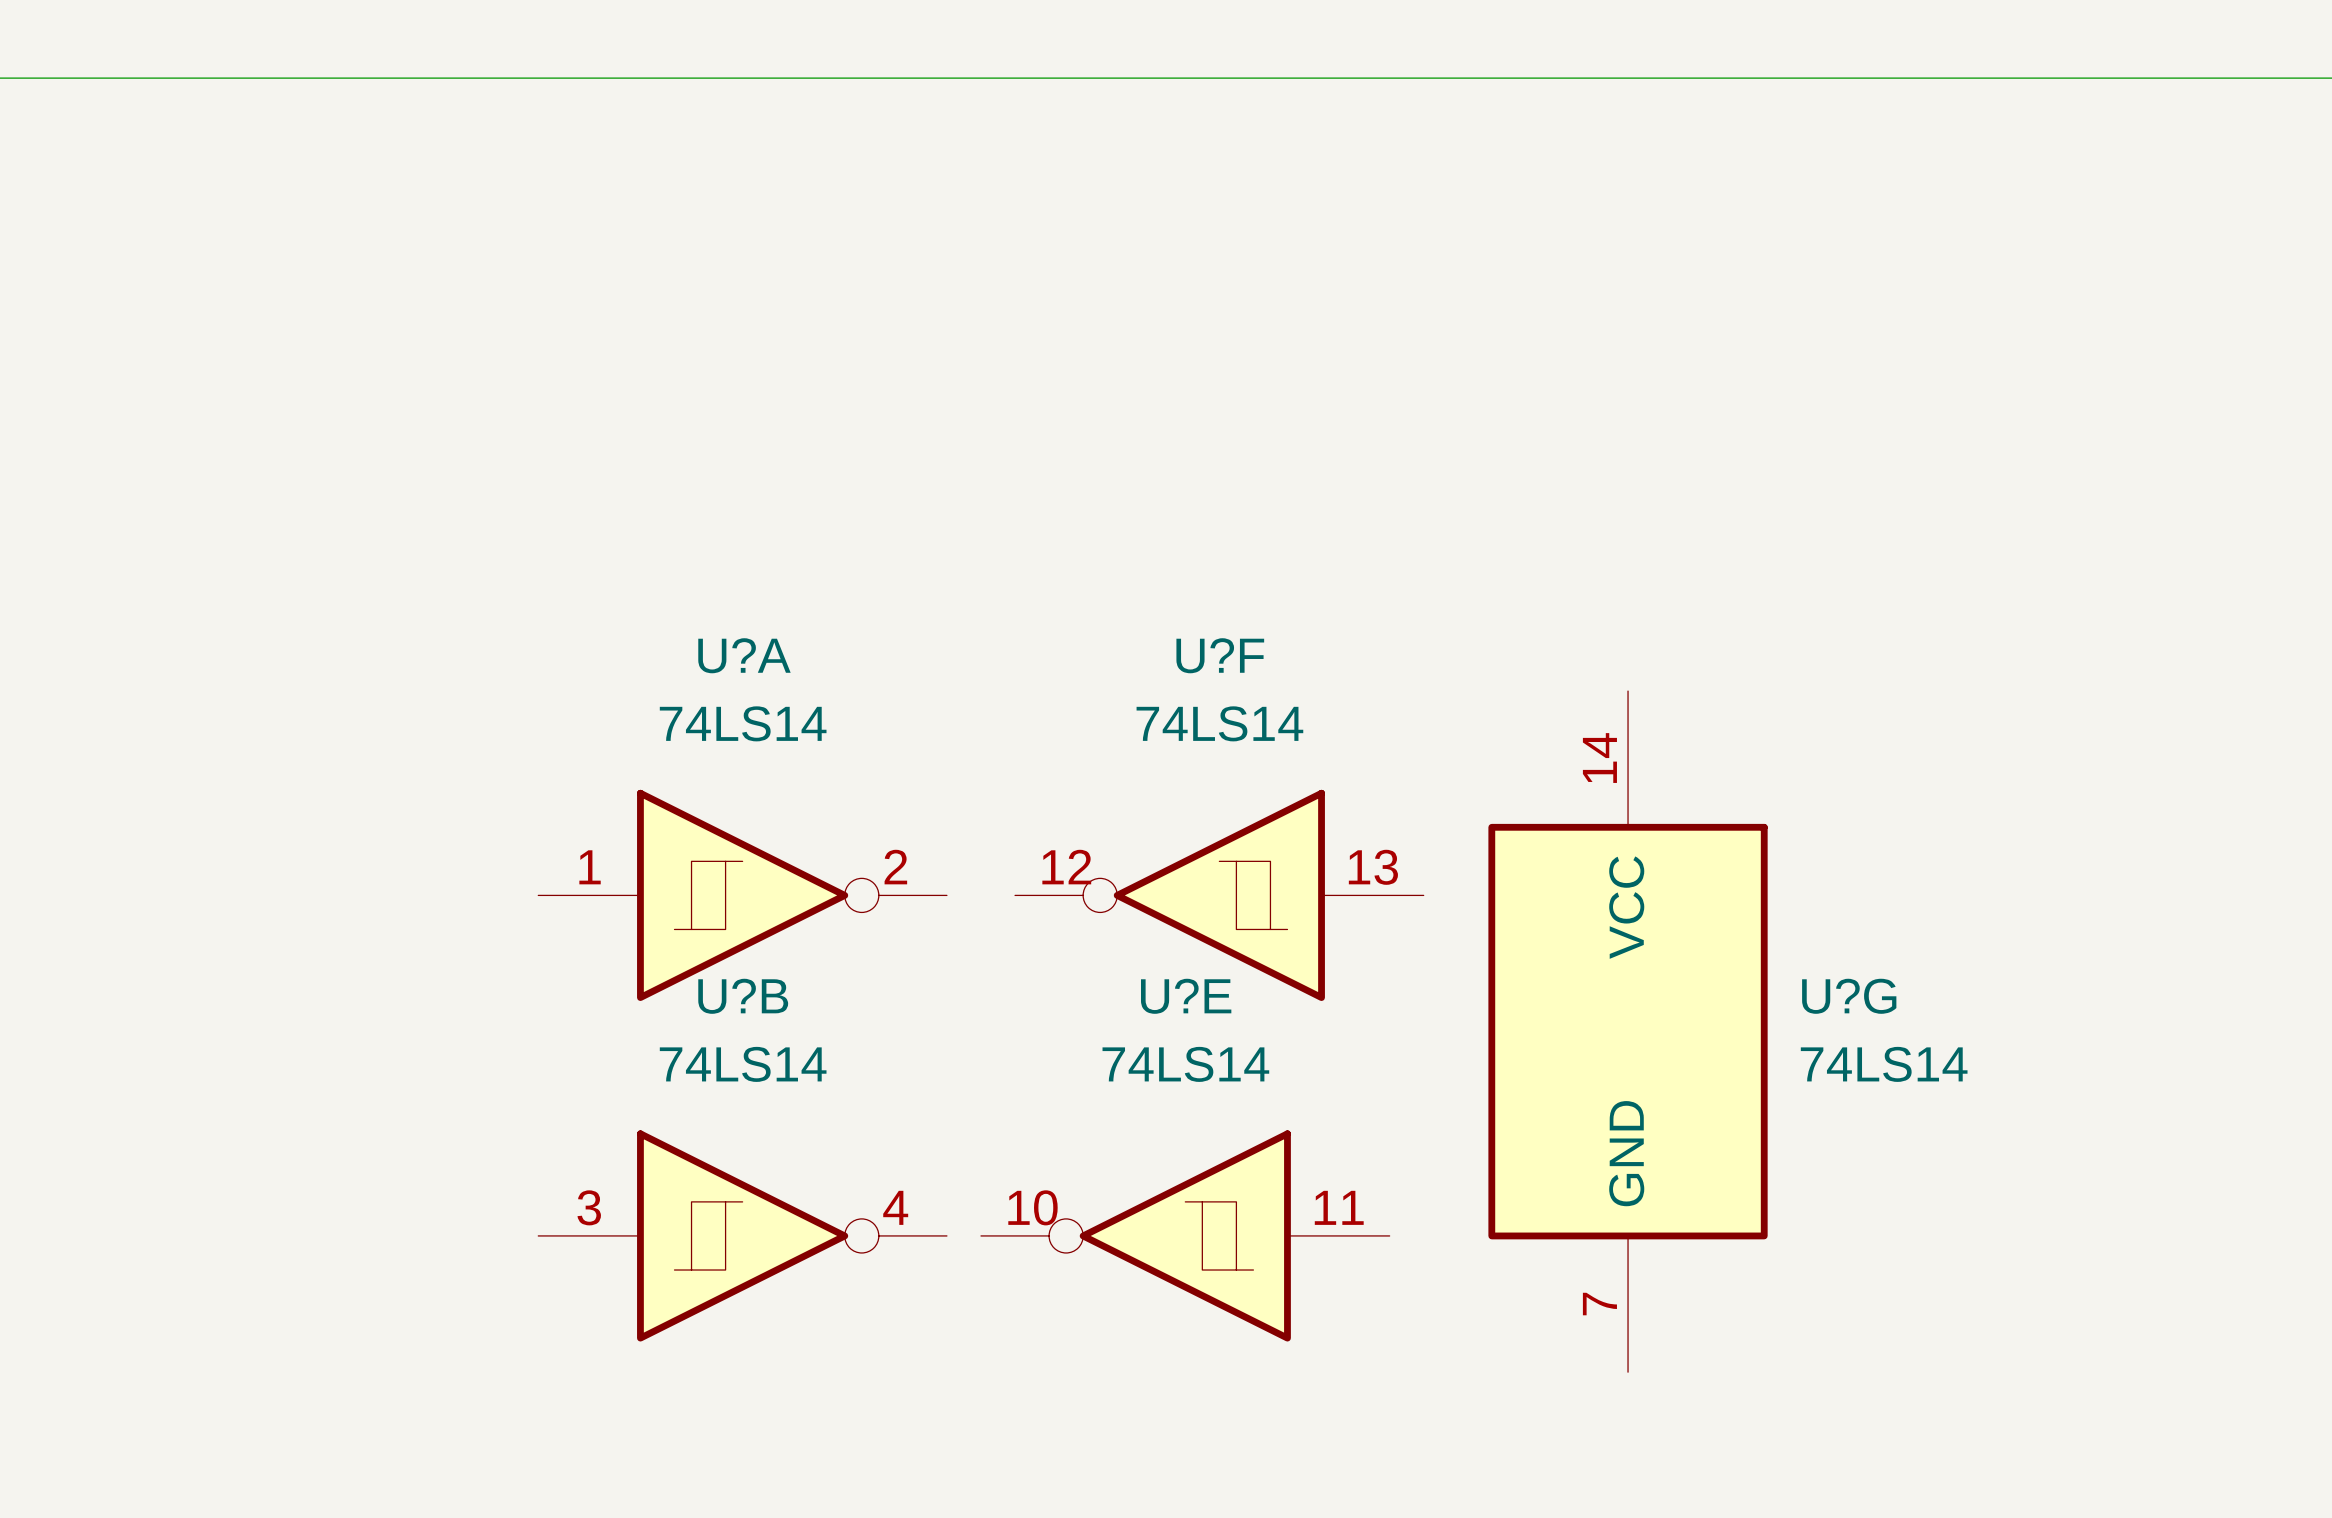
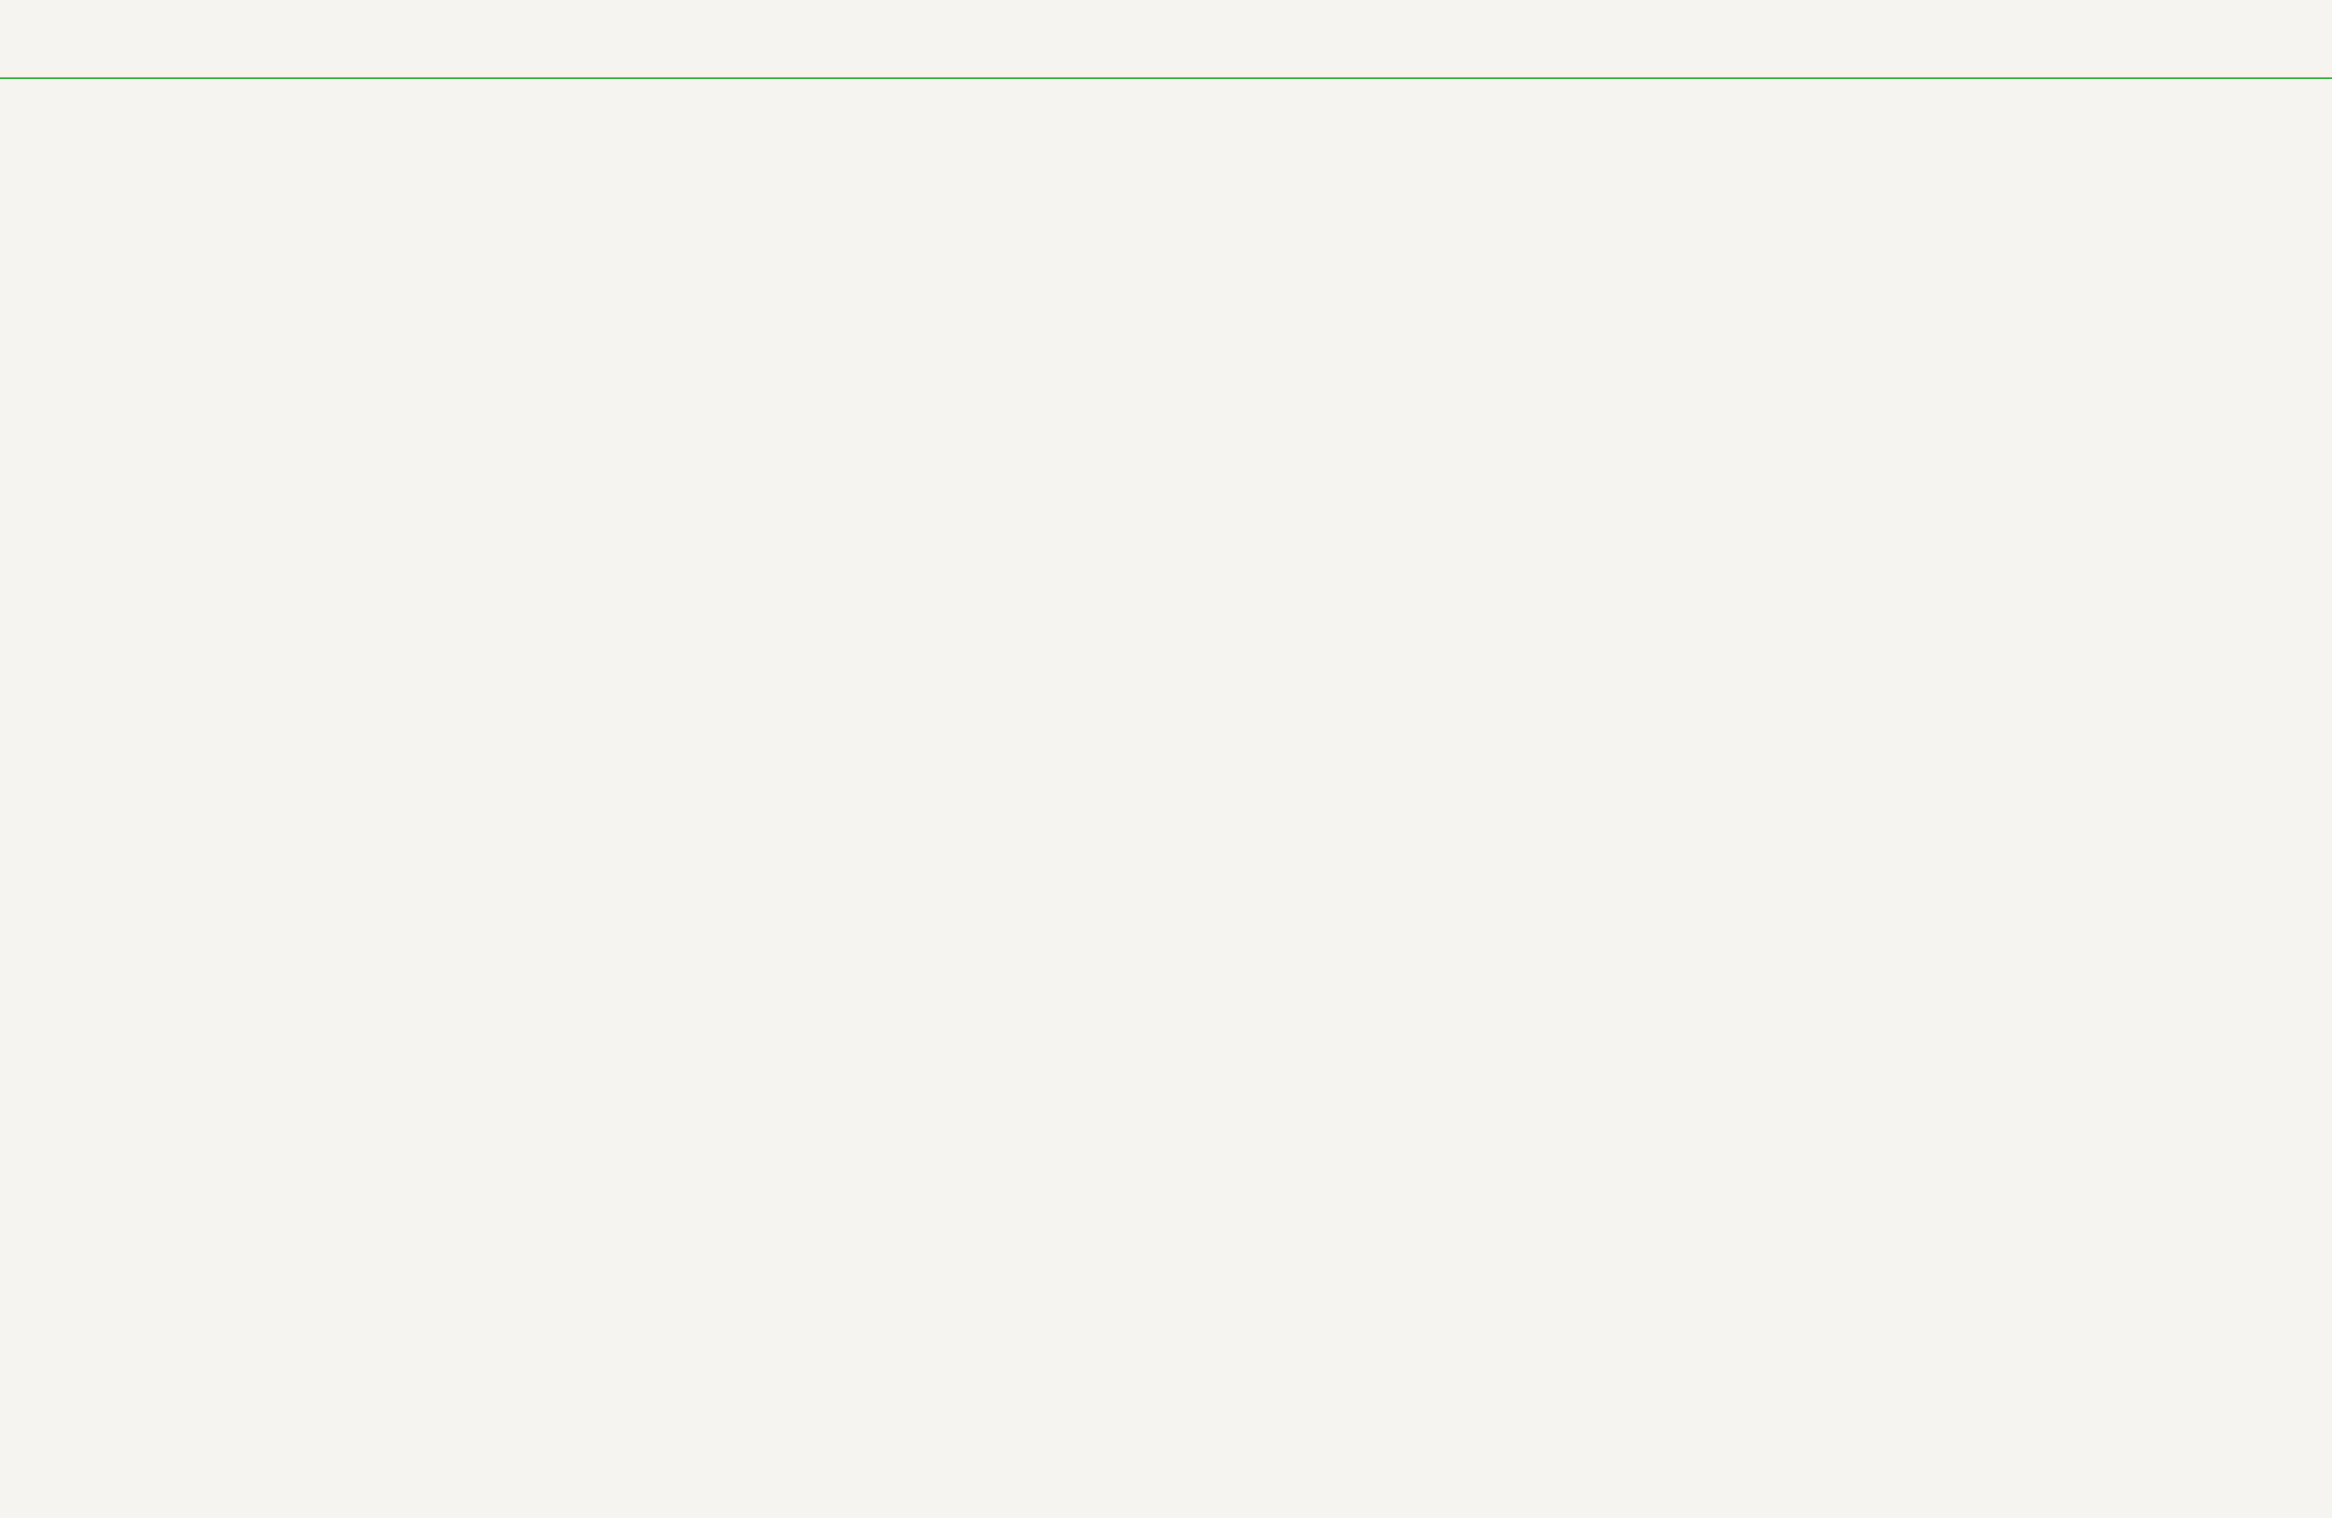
U?A: 74LS14 (742, 895) -> none
U?F: 74LS14 (1219, 895) -> none
U?G: 74LS14 (1628, 1031) -> none
U?B: 74LS14 (742, 1235) -> none
U?E: 74LS14 (1185, 1235) -> none

